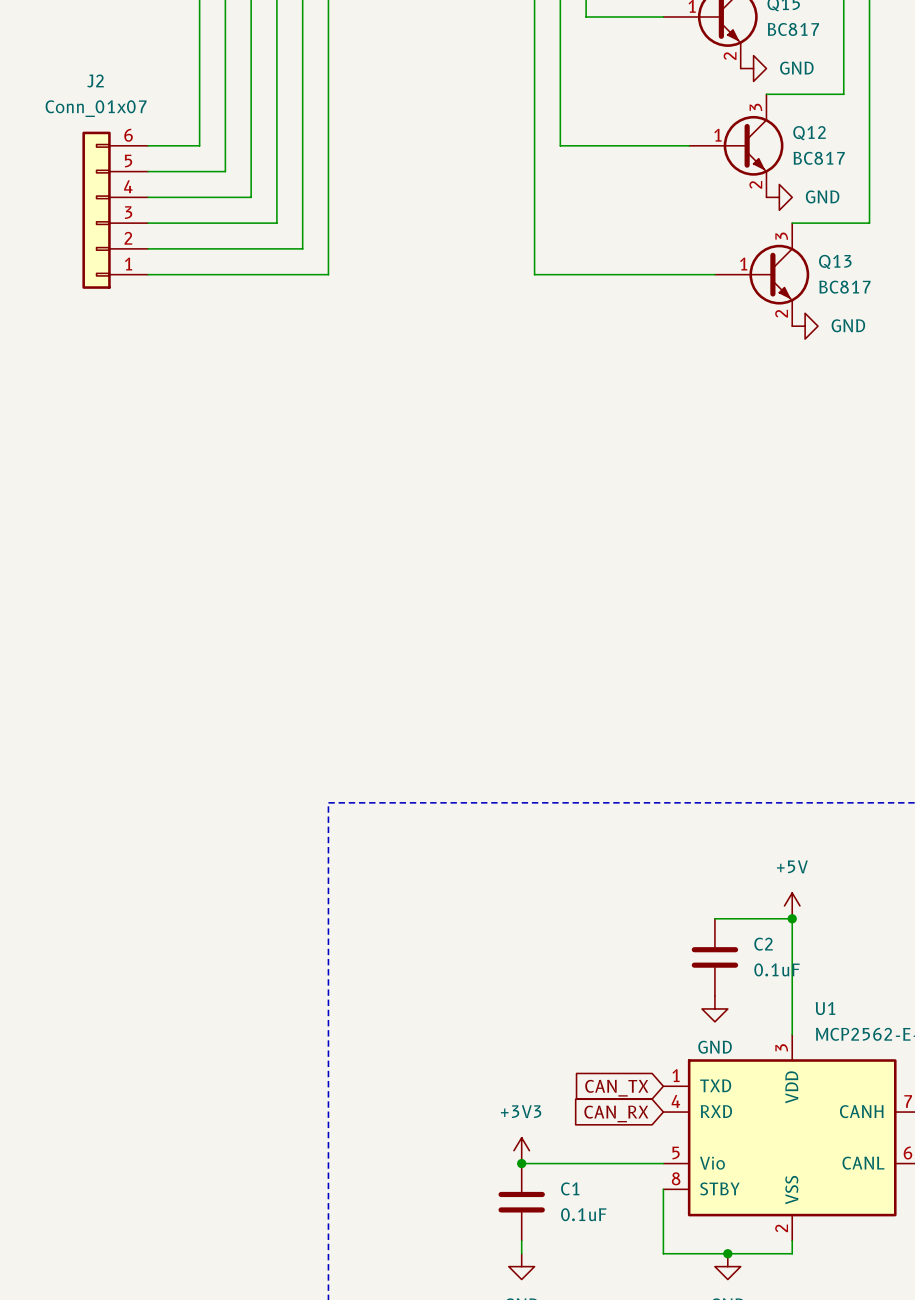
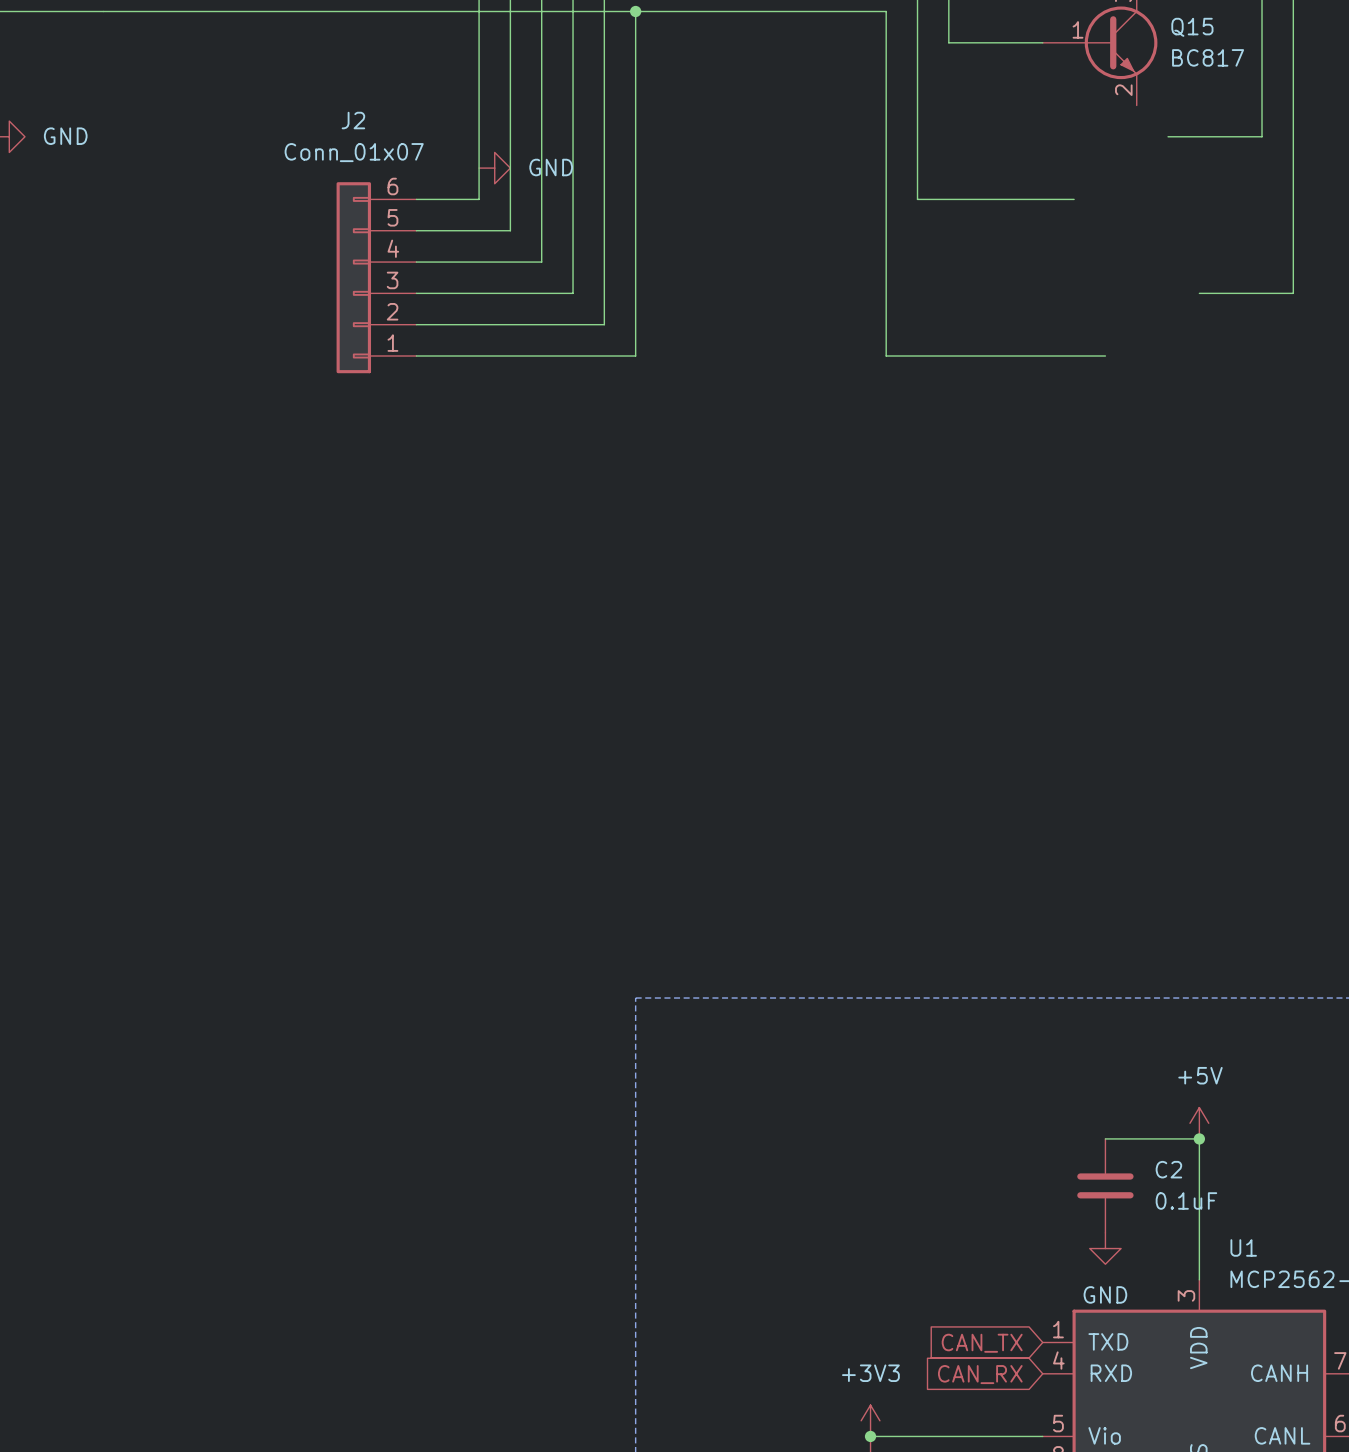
power symbol: GND (753, 68) -> none
power symbol: none -> GND (494, 168)
Q12: BC817 (736, 145) -> none
power symbol: GND (779, 197) -> none
Q13: BC817 (762, 274) -> none
power symbol: GND (805, 326) -> none

